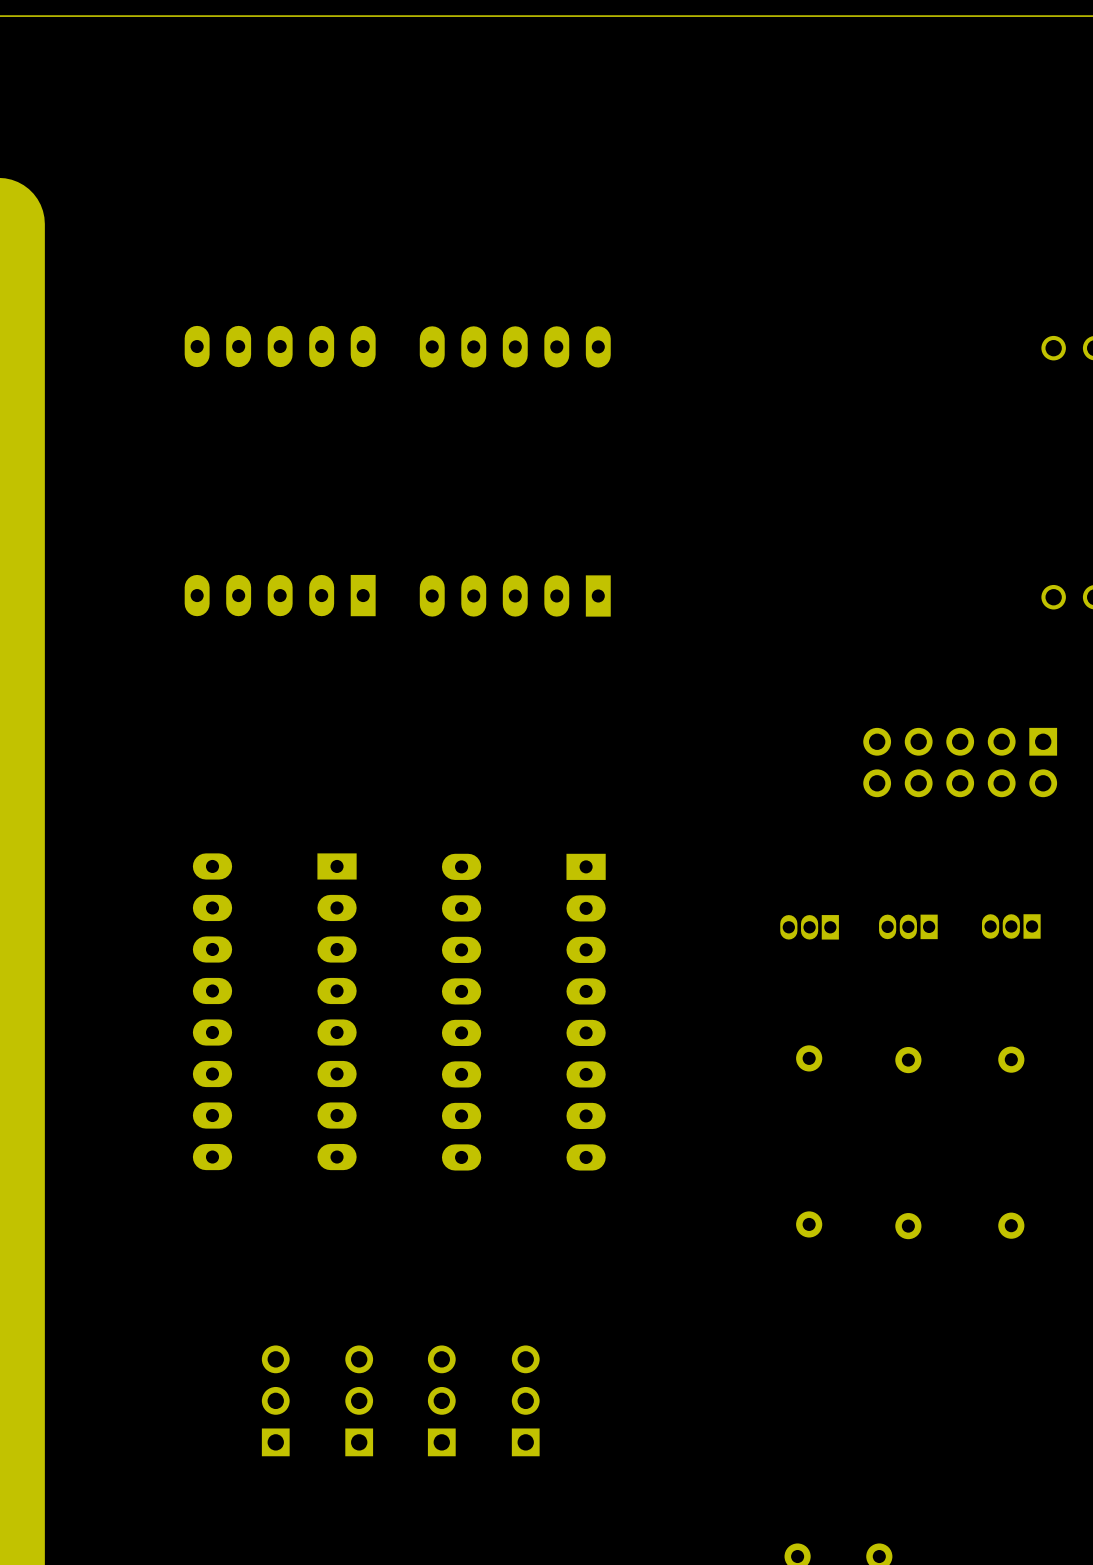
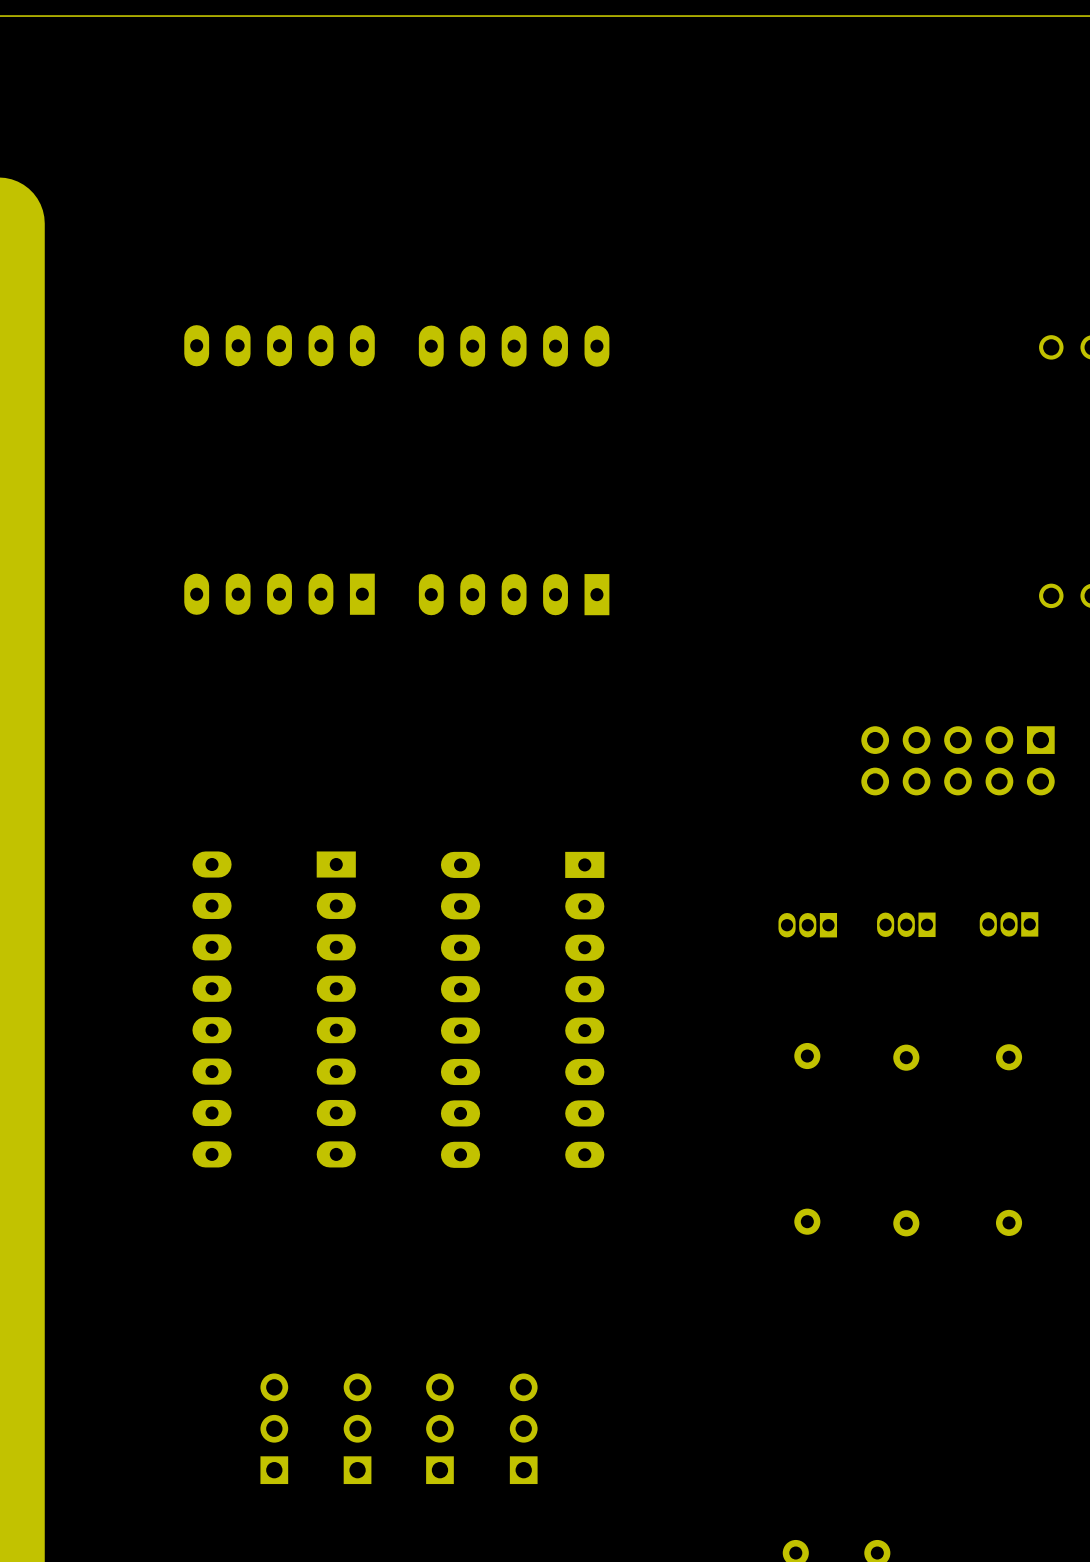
part position: (275, 1400) -> (274, 1428)
part position: (359, 1400) -> (357, 1428)
part position: (441, 1400) -> (439, 1428)
part position: (525, 1400) -> (523, 1428)

